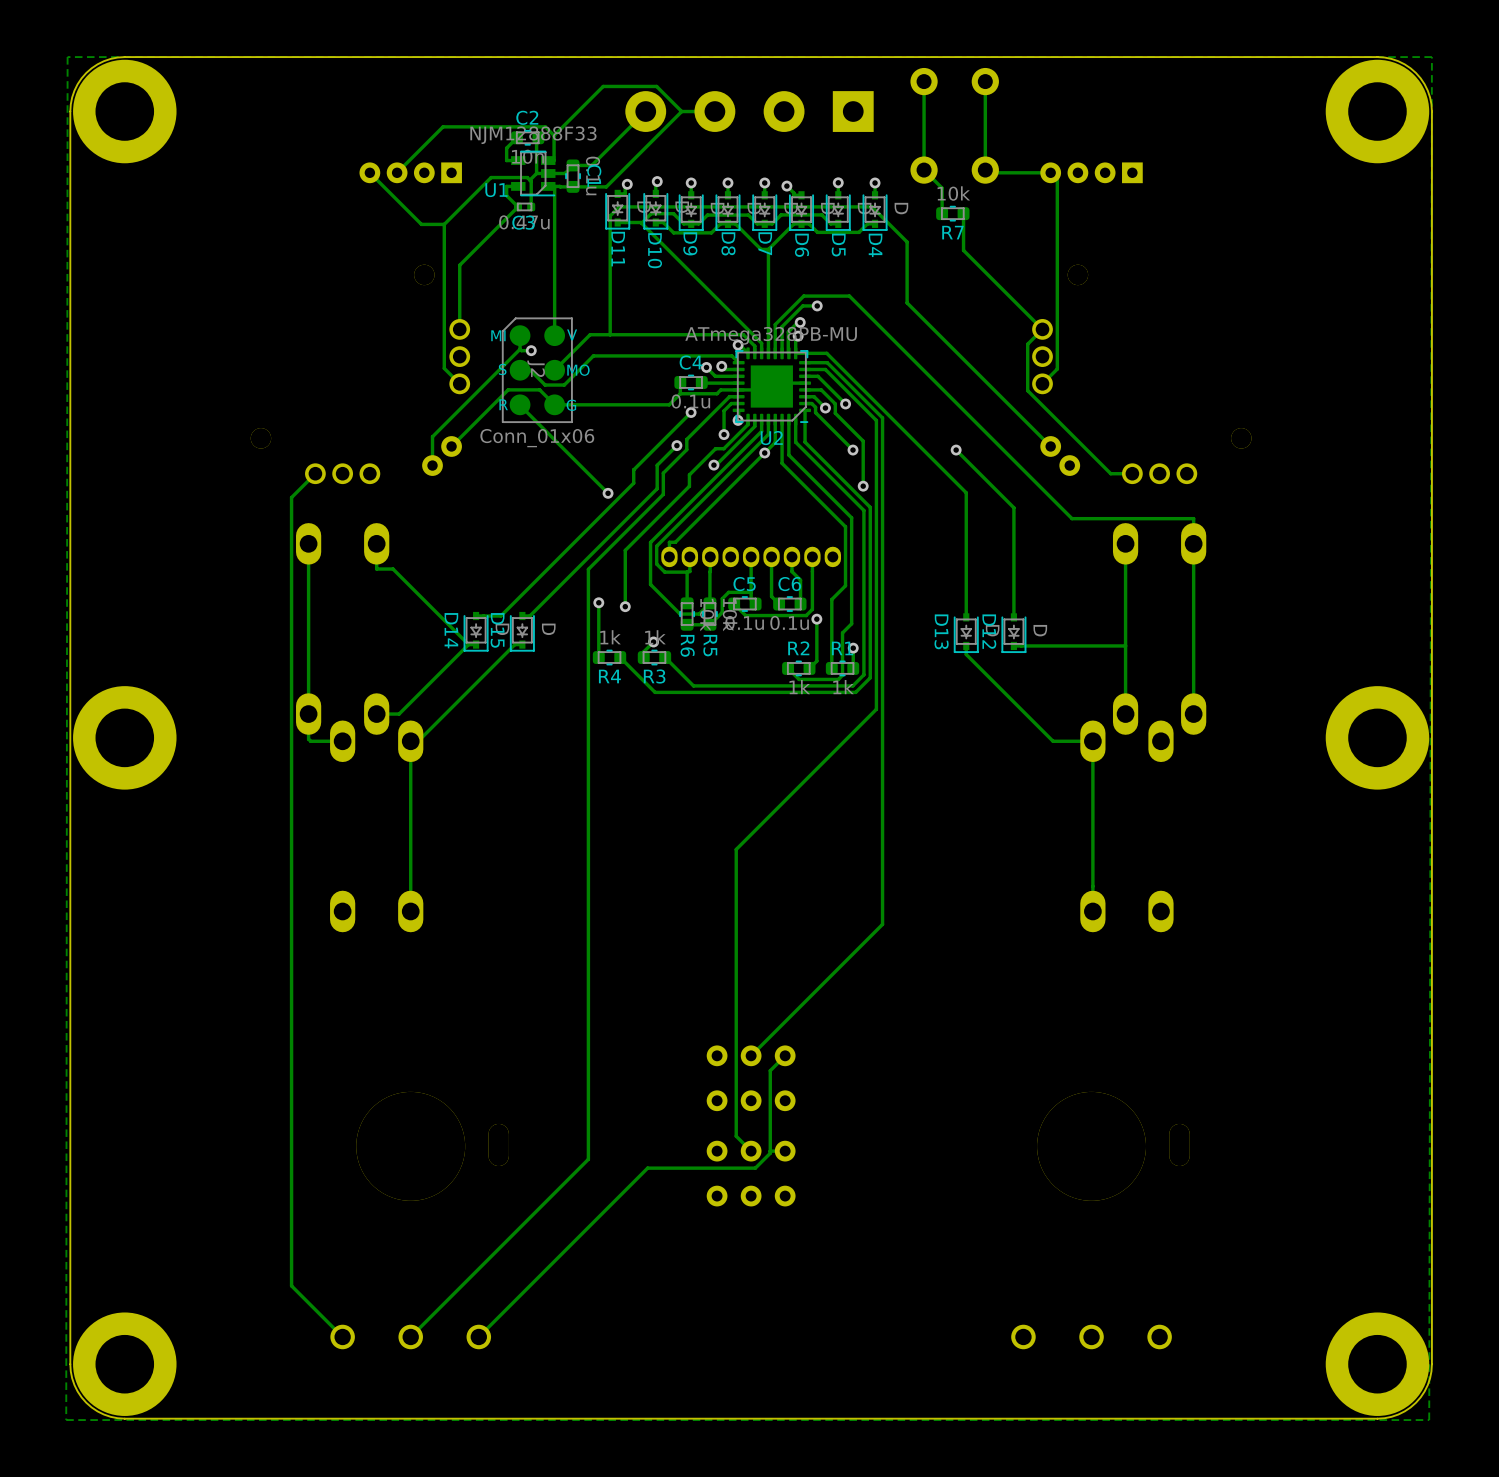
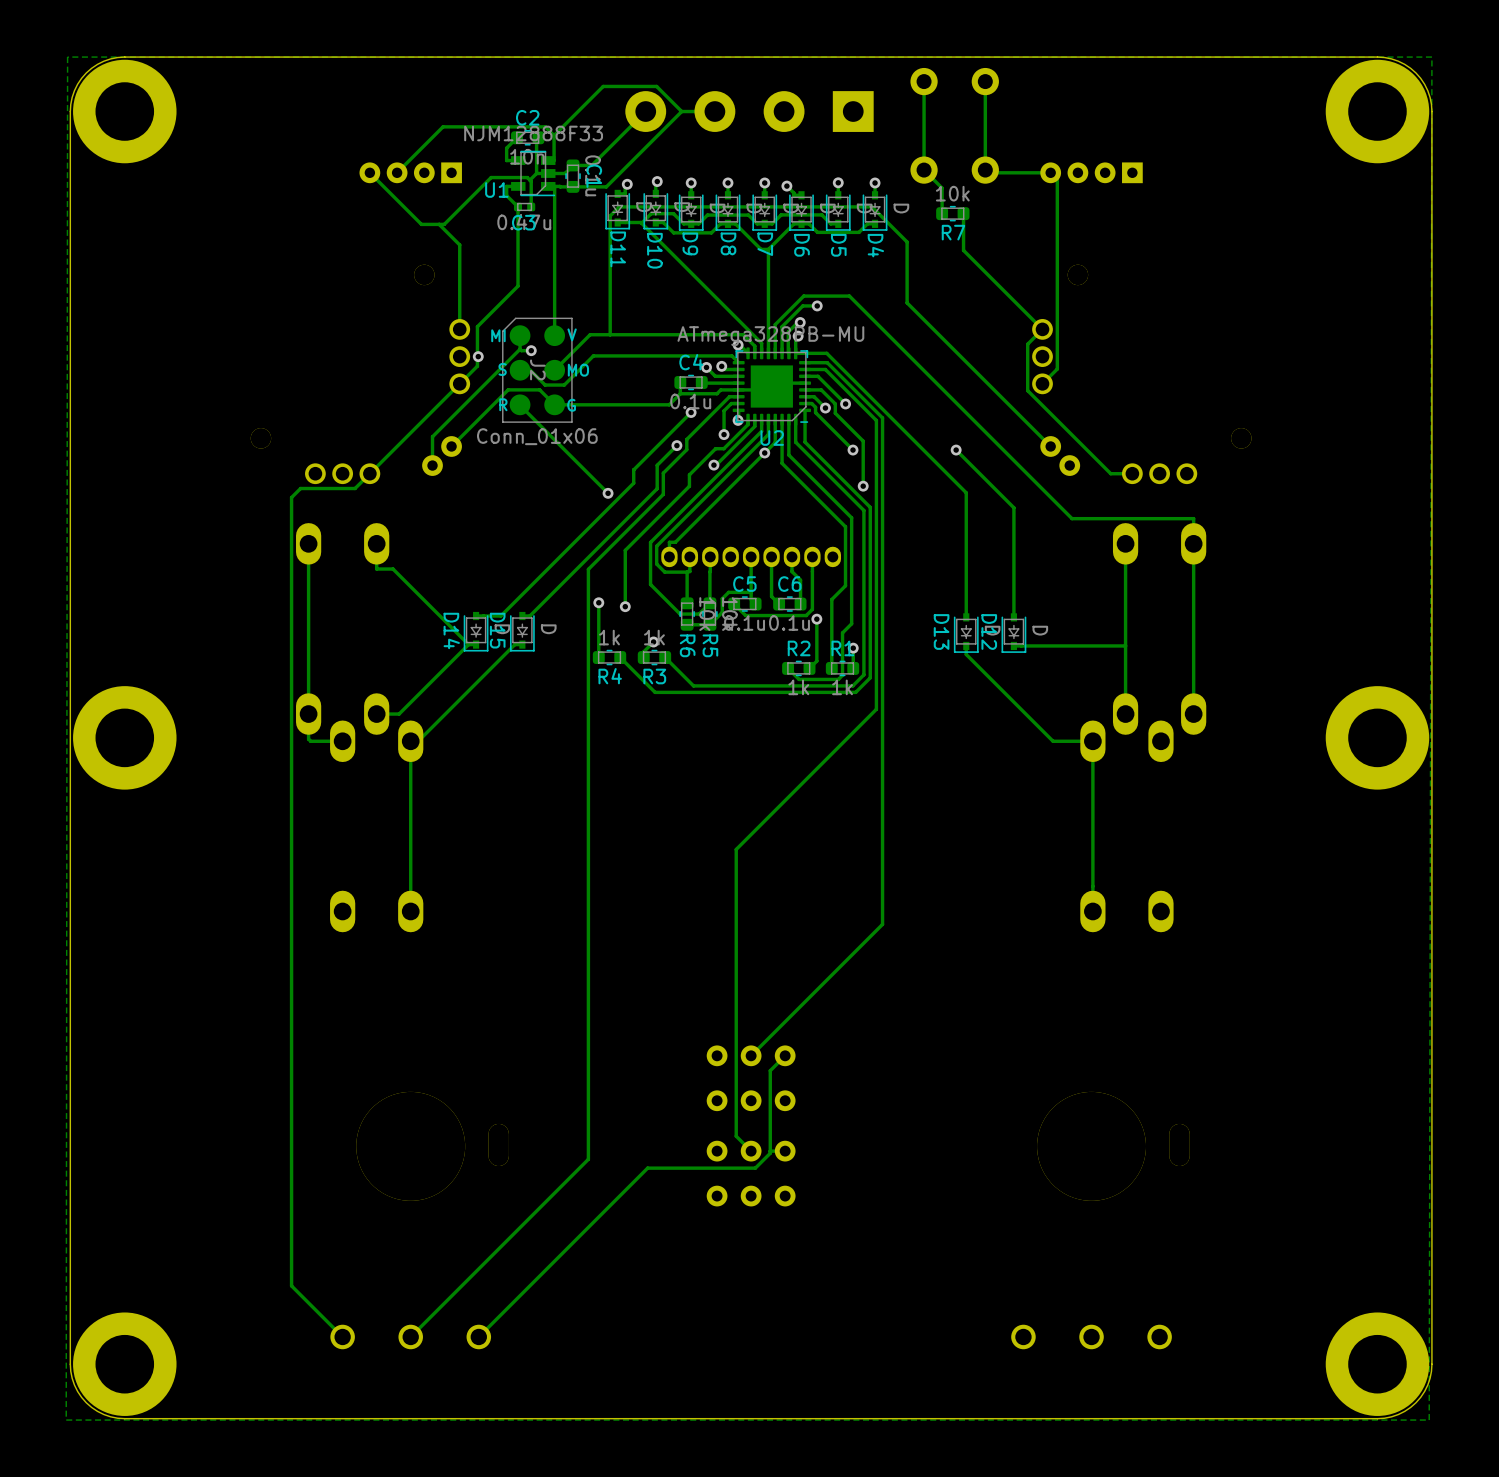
track: (518, 206) (459, 265) -> (439, 224) (459, 244) (459, 265)
track: (444, 224) (444, 368) (459, 383) -> none
via: none -> (478, 356)
track: (315, 473) (300, 488) -> (518, 206) (518, 286) (477, 326) (477, 366) (355, 488) (300, 488)

